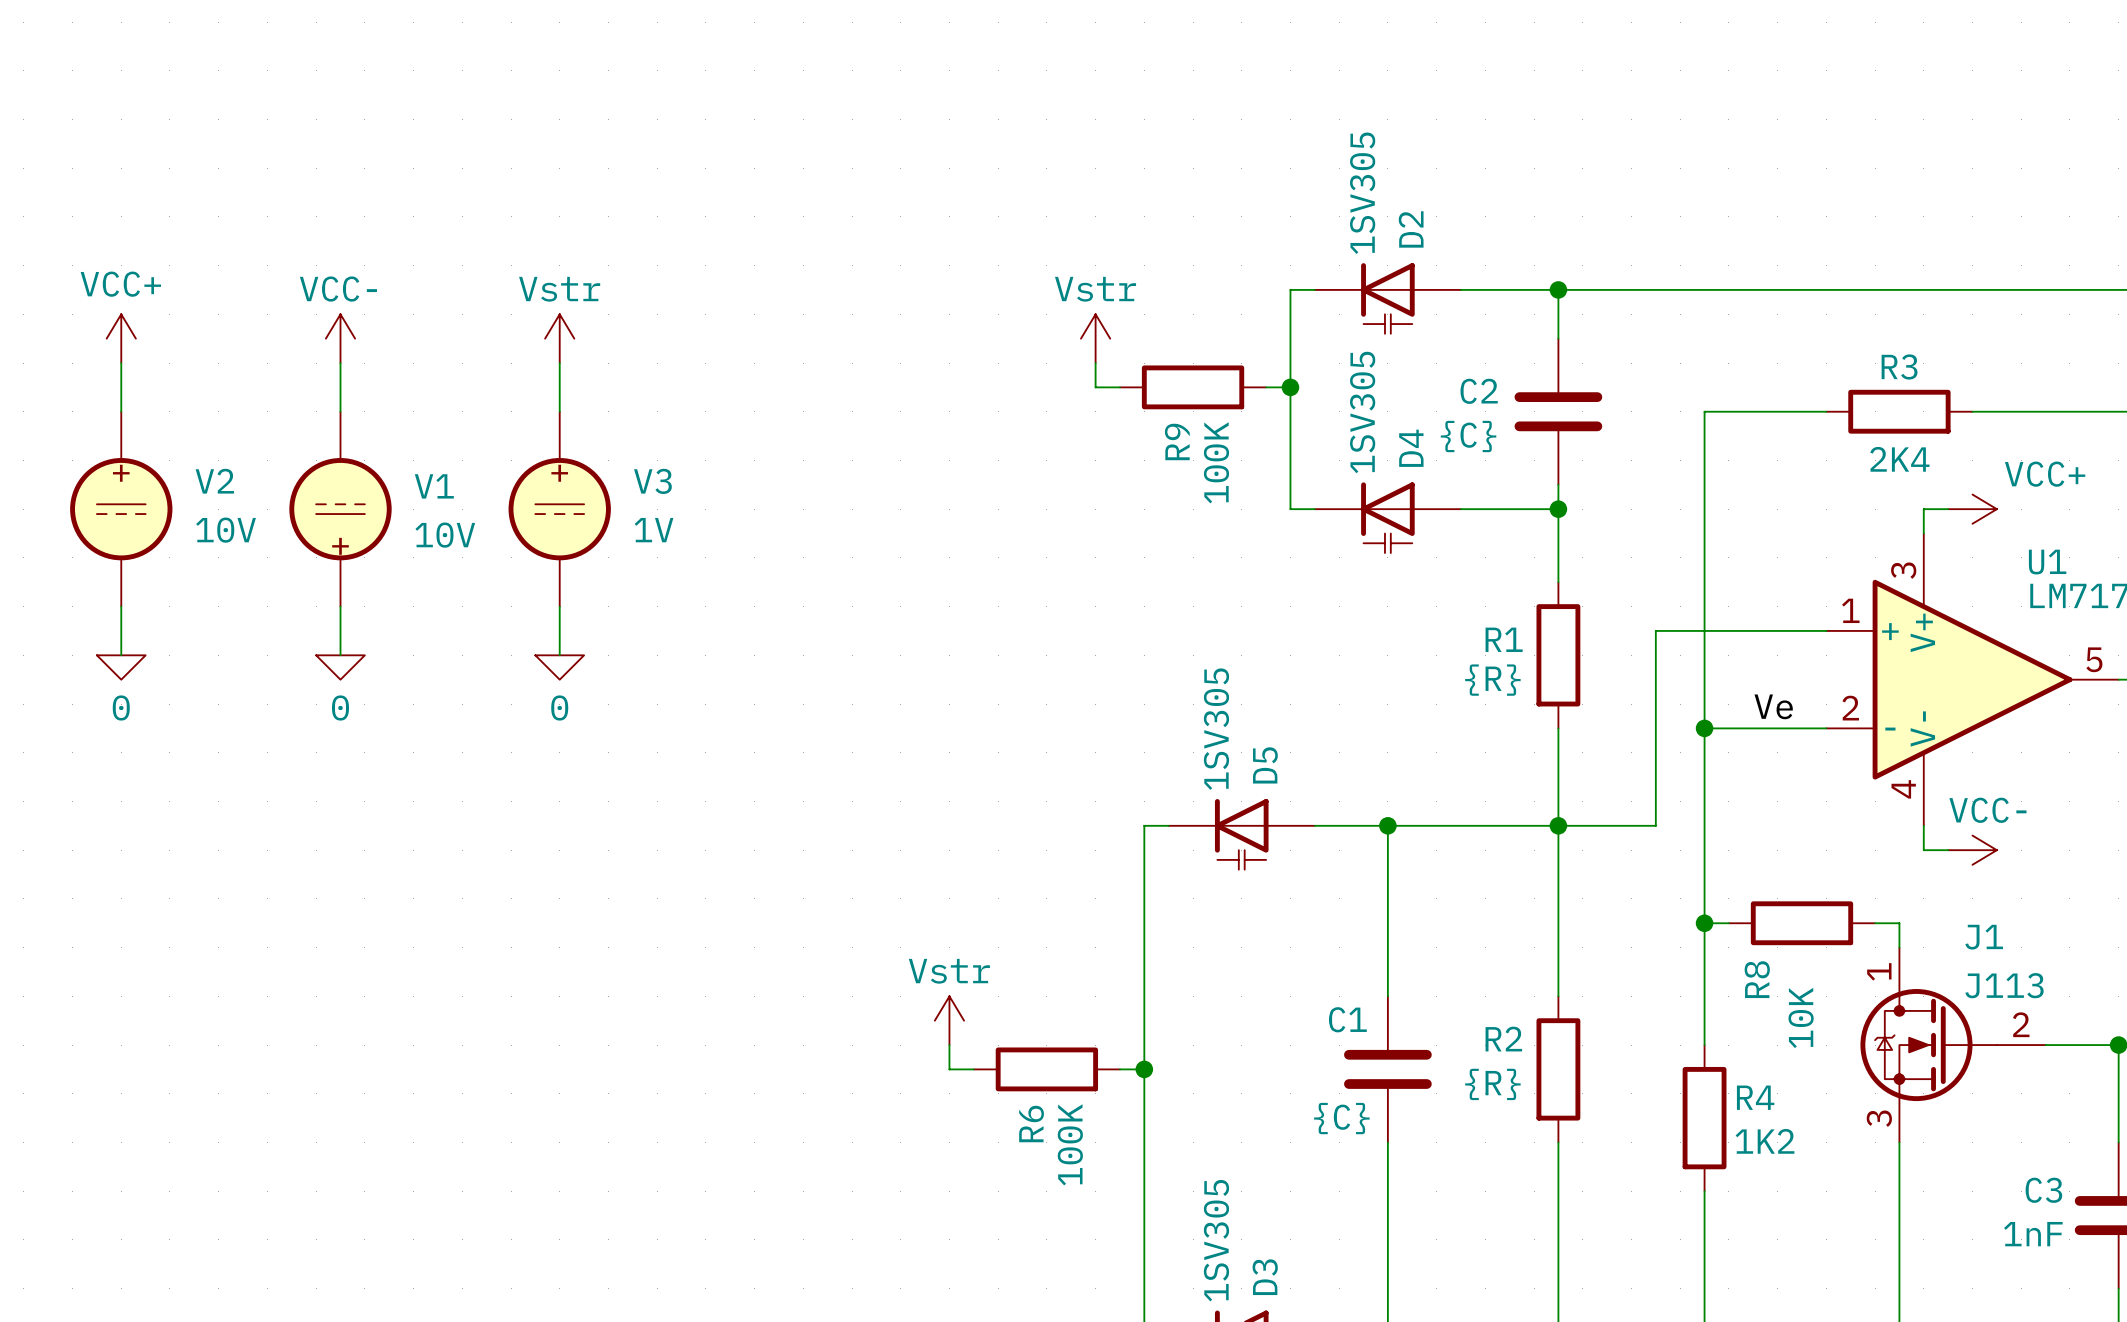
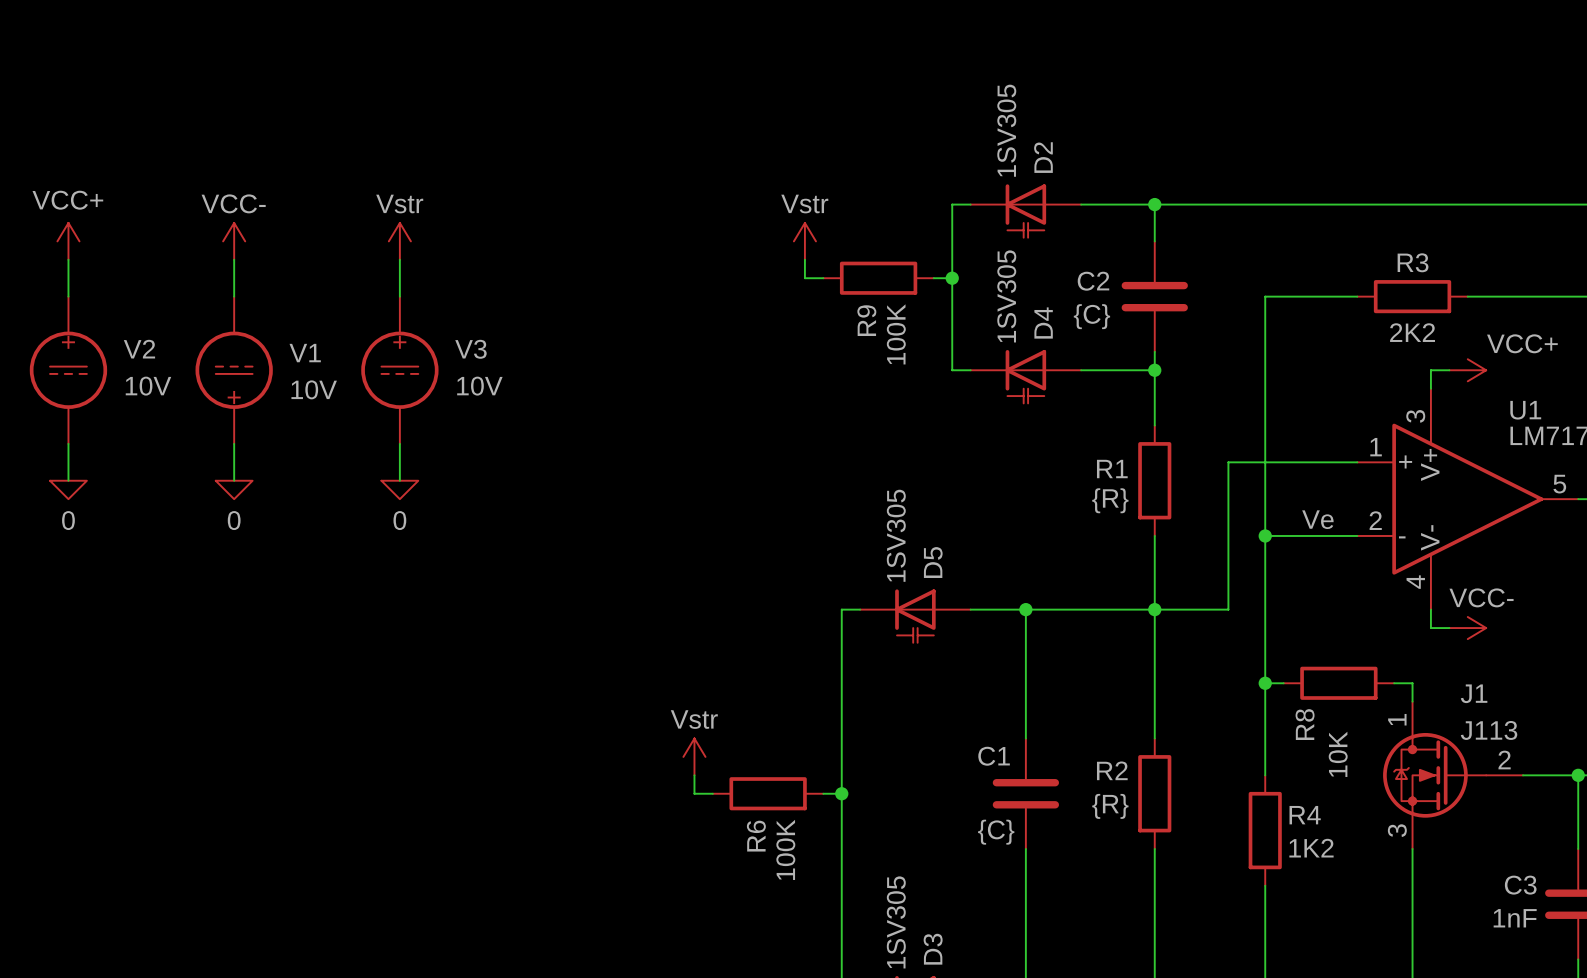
R3 value: 2K4 (1899, 459) -> 2K2 (1412, 332)
V3 value: 1V (654, 530) -> 10V (479, 386)

